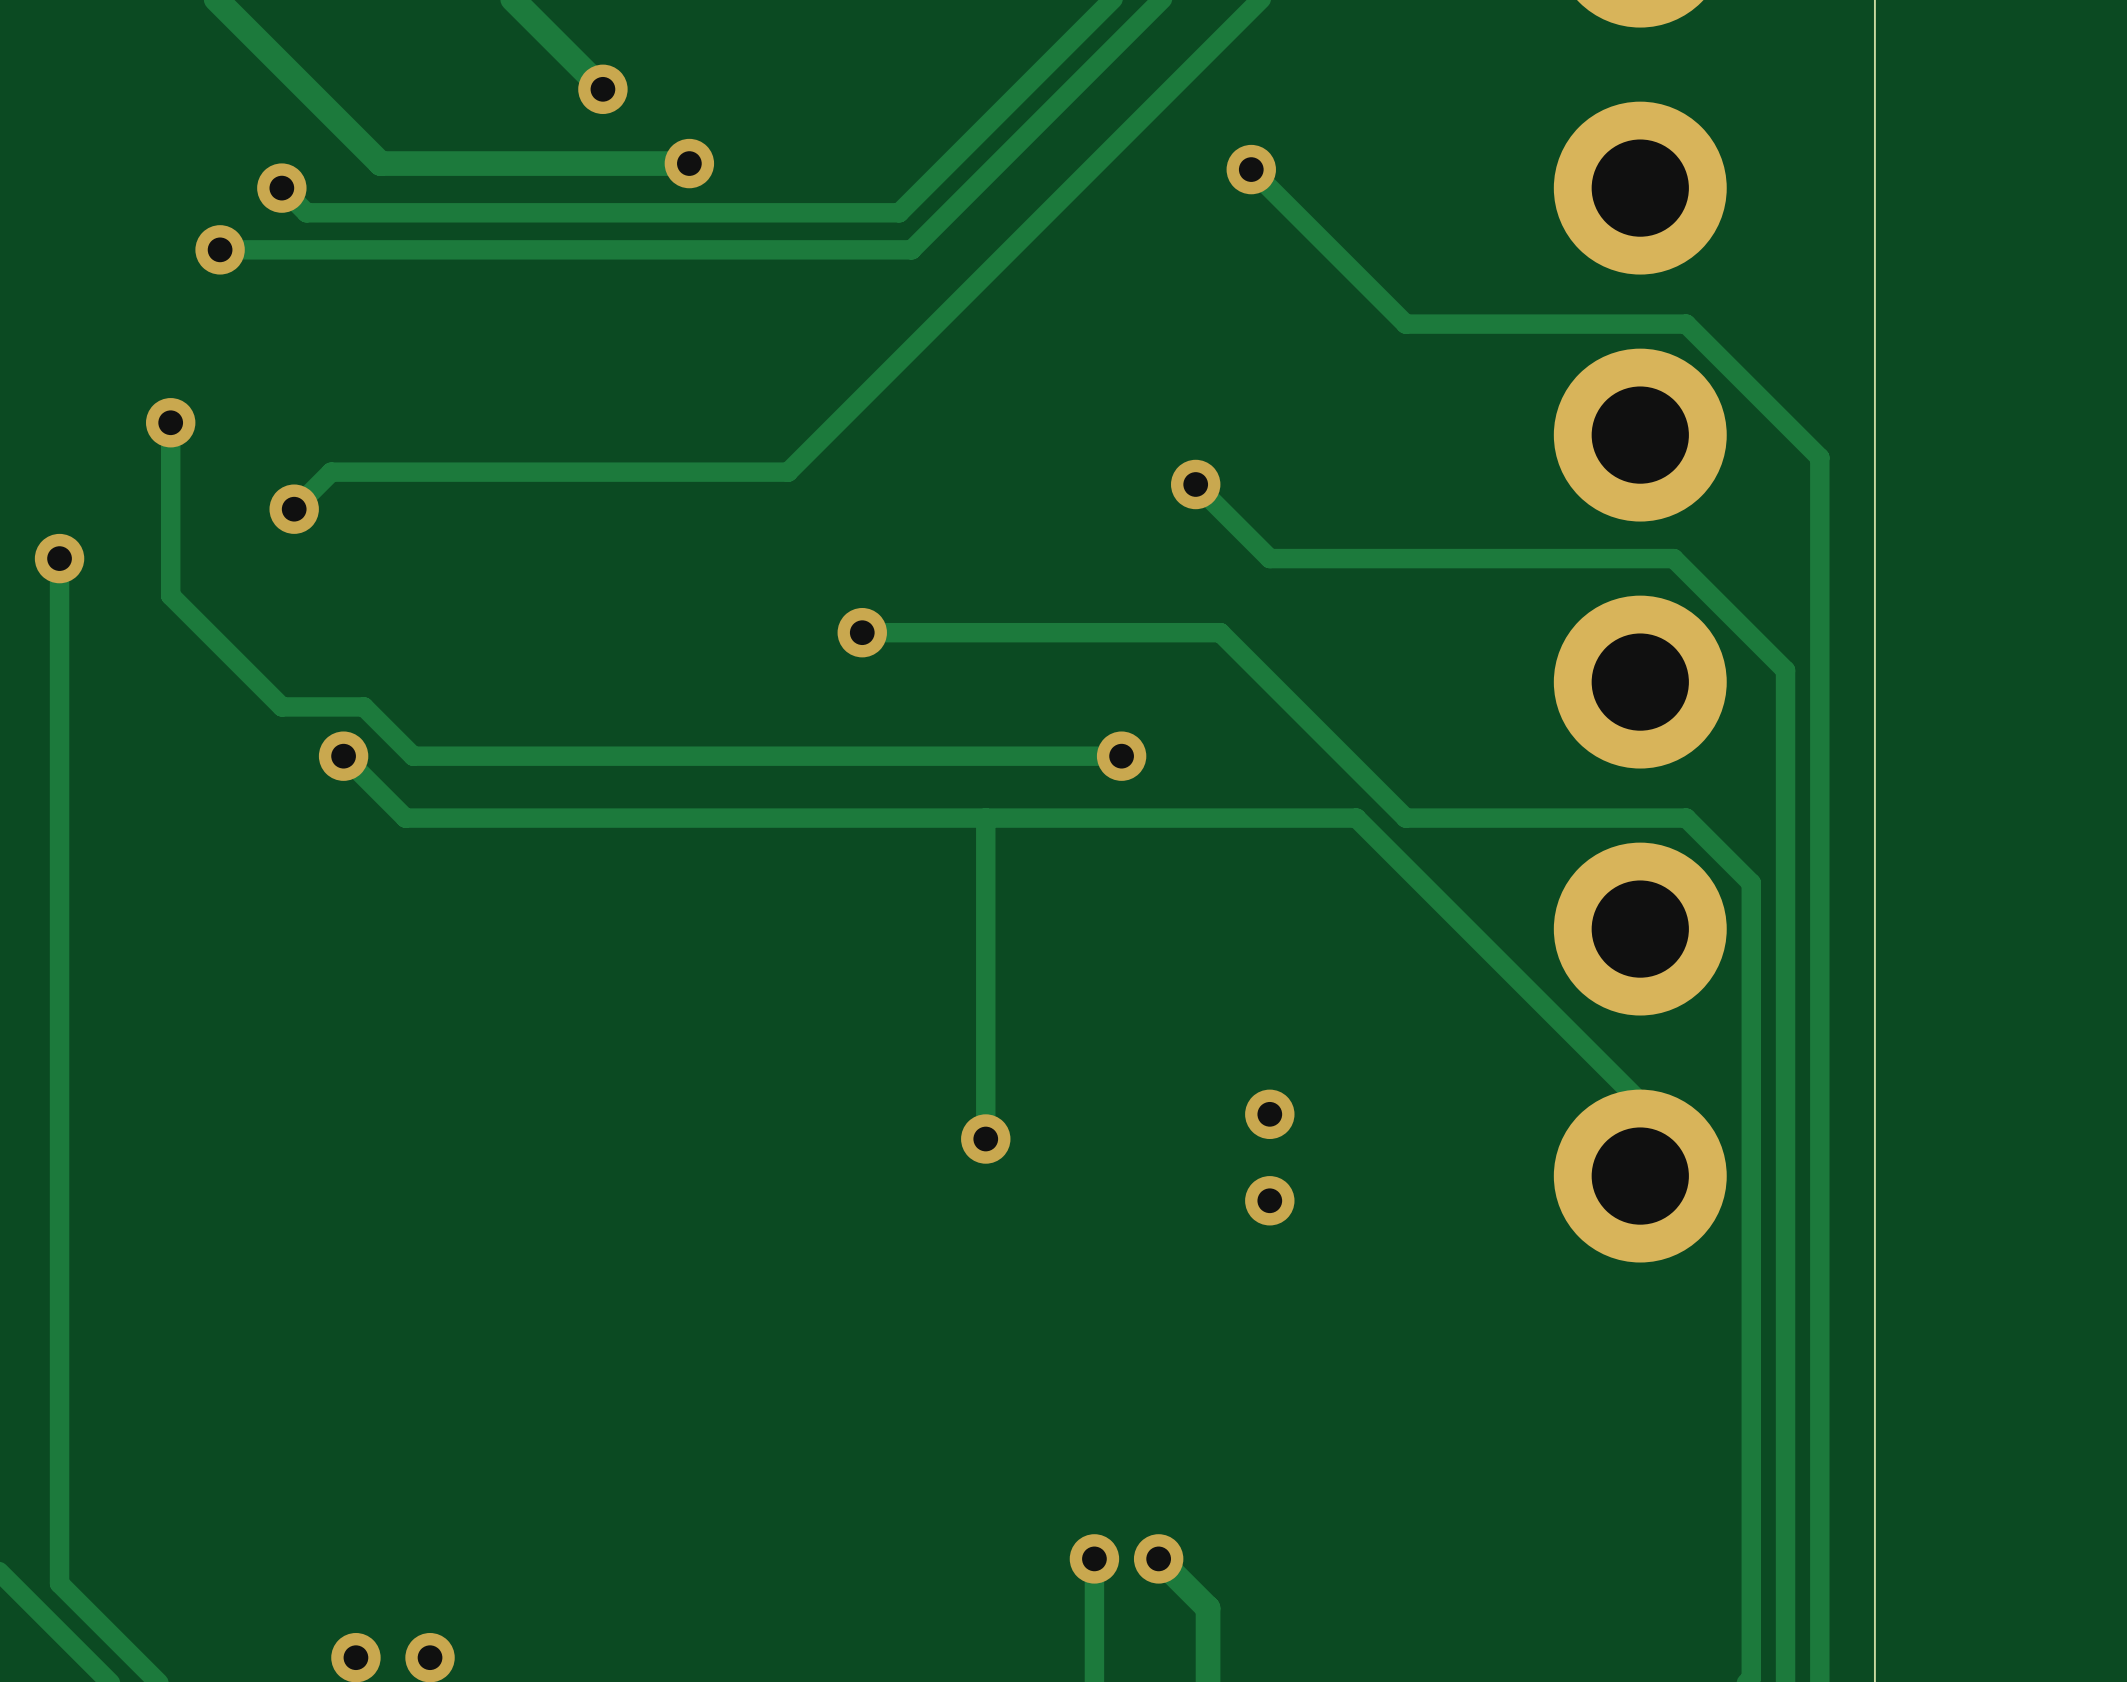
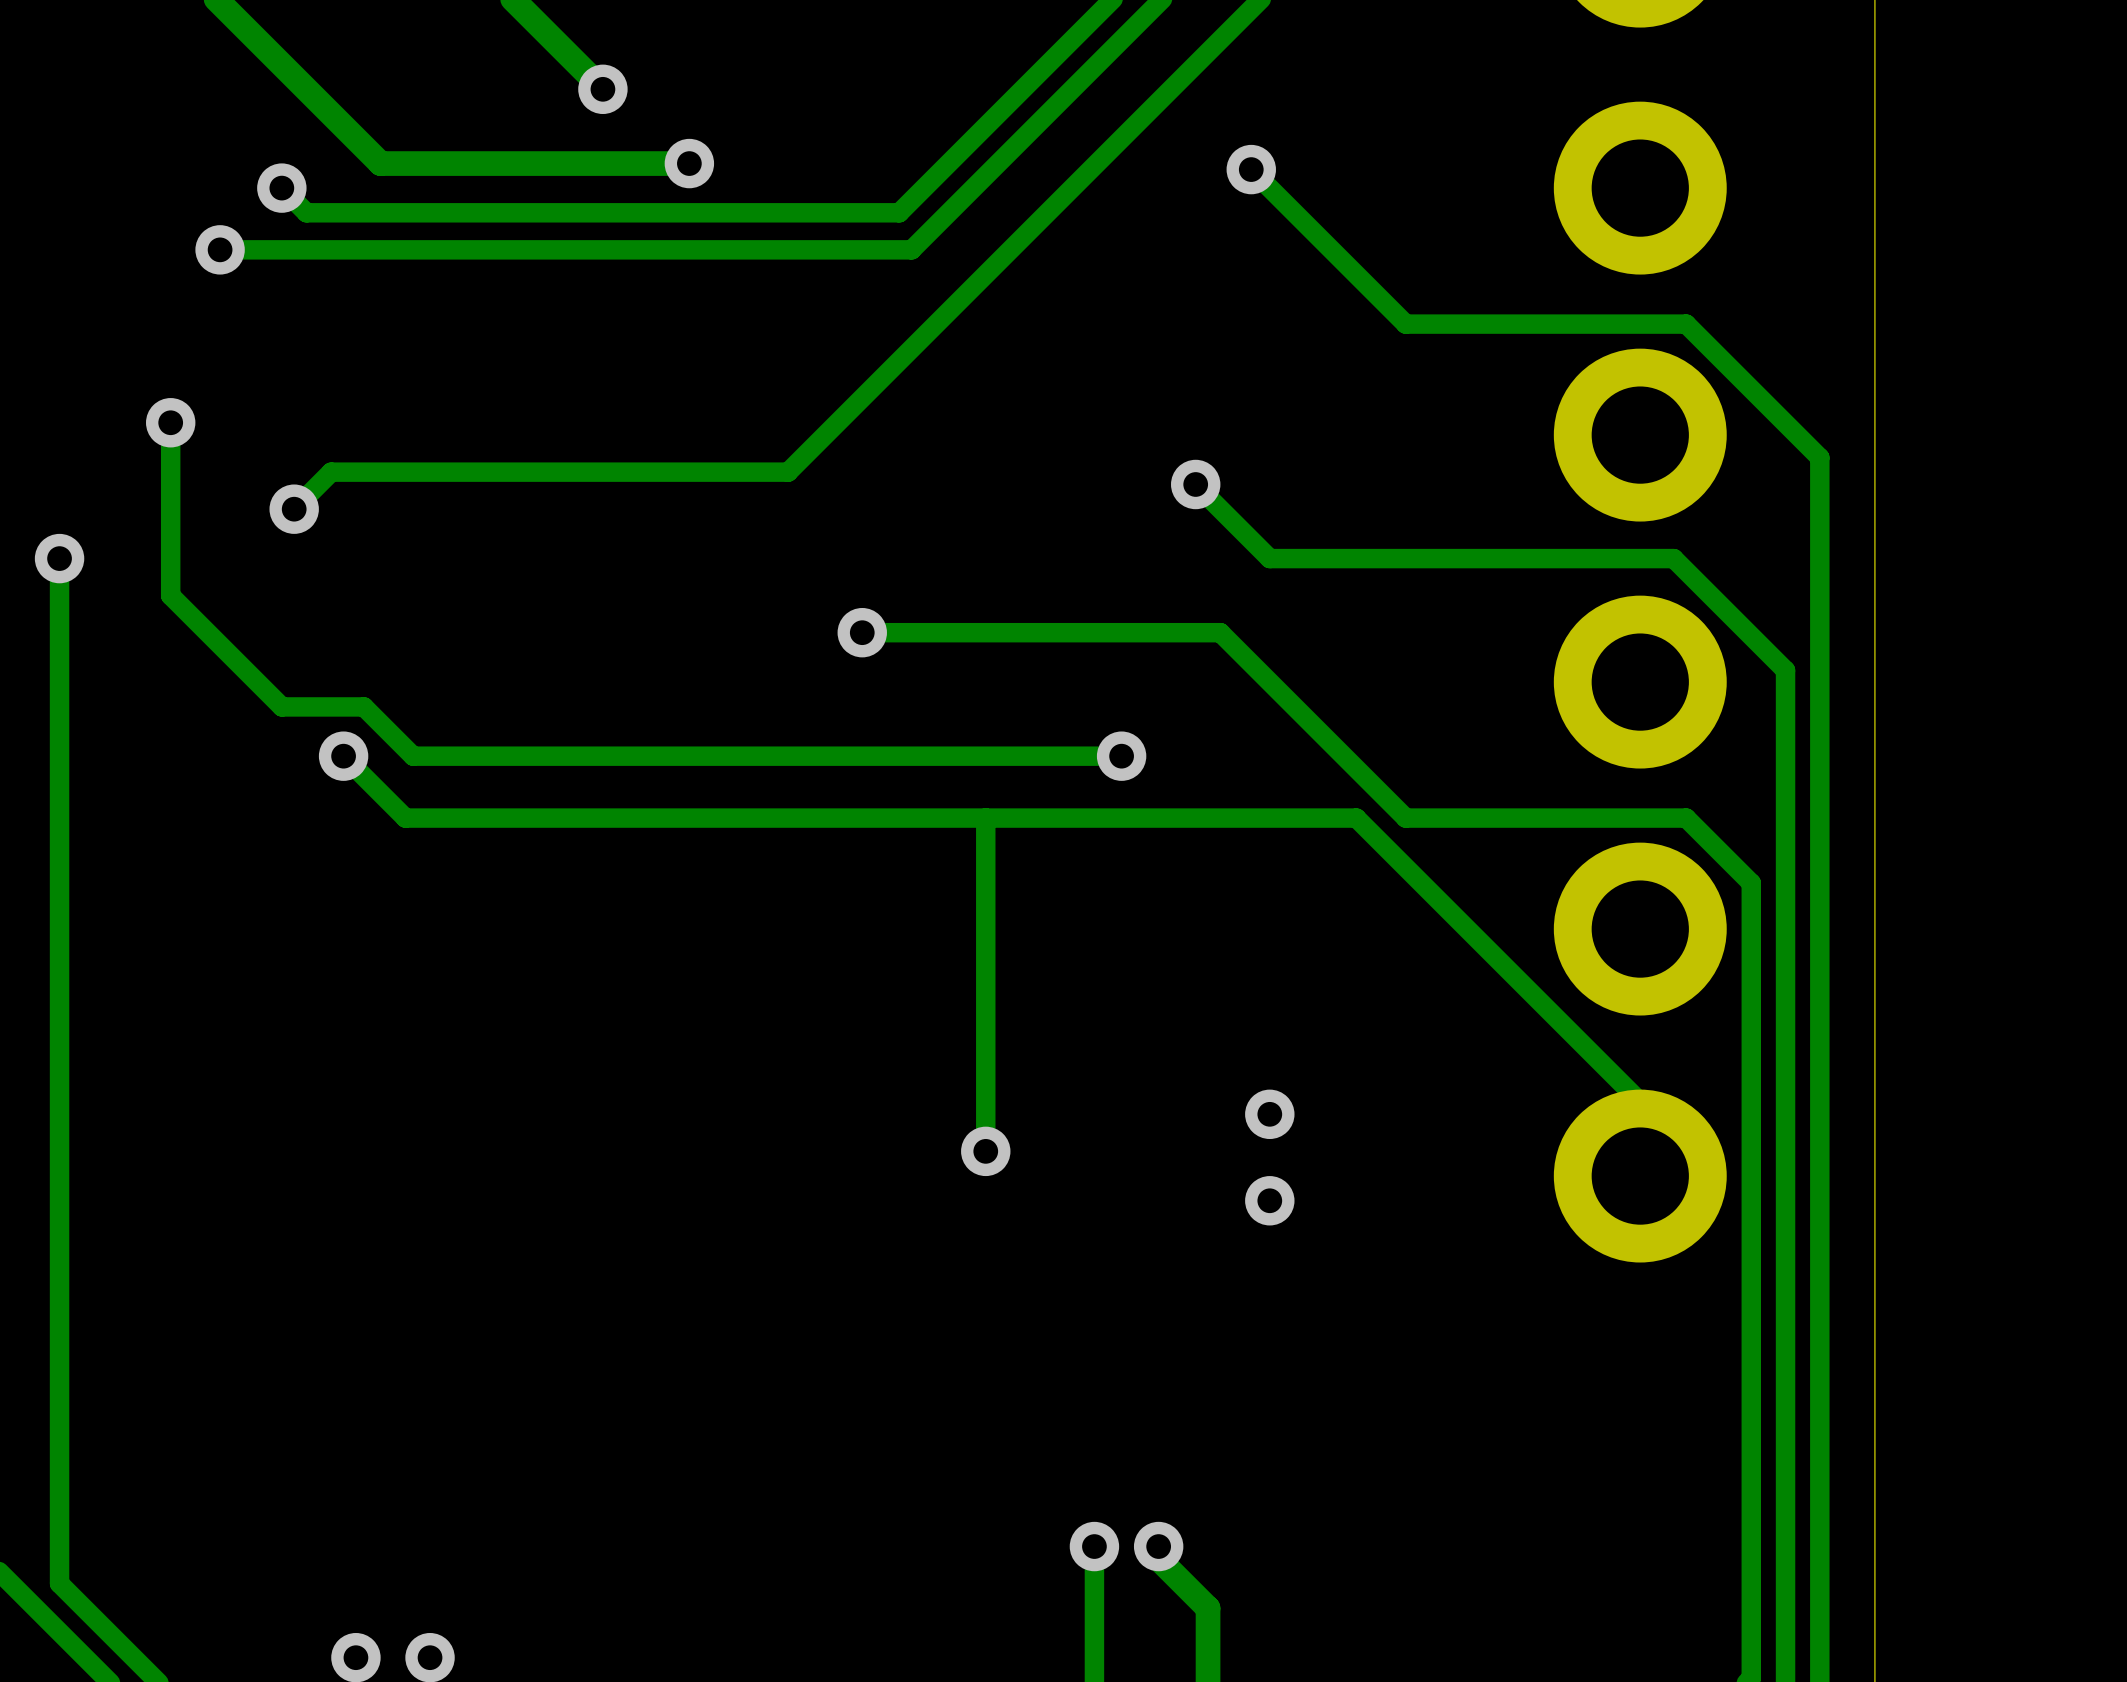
via position: (985, 1139) -> (985, 1151)
via position: (1094, 1558) -> (1094, 1546)
via position: (1158, 1558) -> (1158, 1546)

